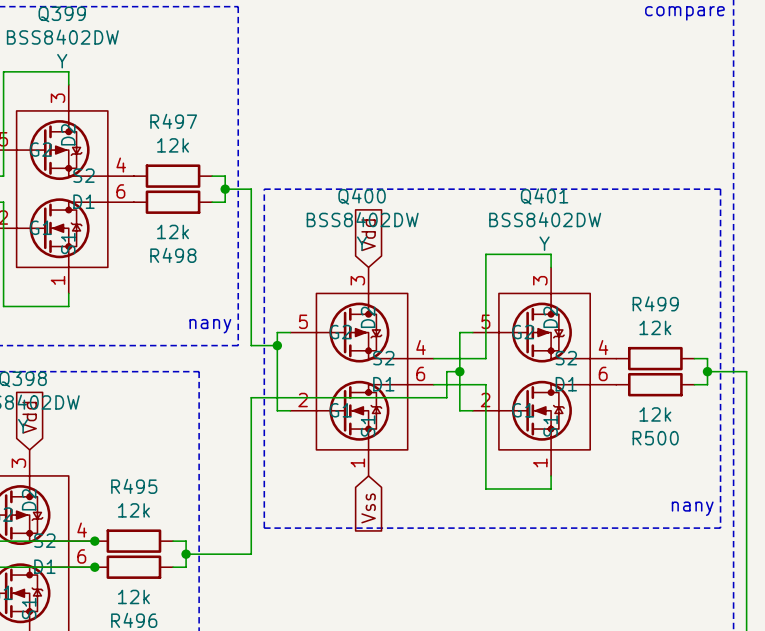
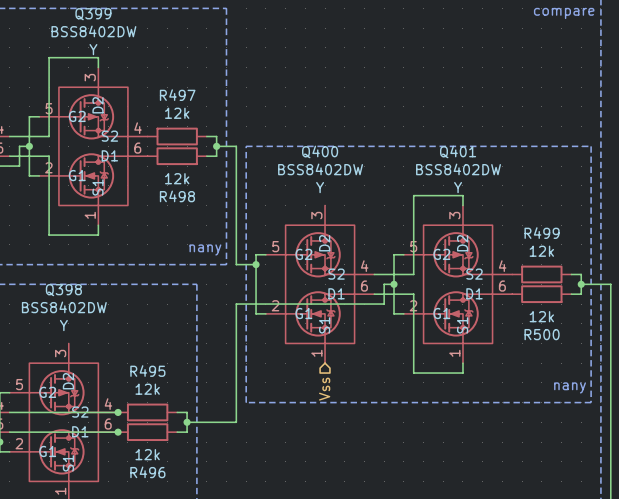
global label: Vdd (368, 235) -> none
global label: Vdd (29, 417) -> none
global label: Vss (368, 508) -> none
hierarchical label: none -> Vss (324, 389)

